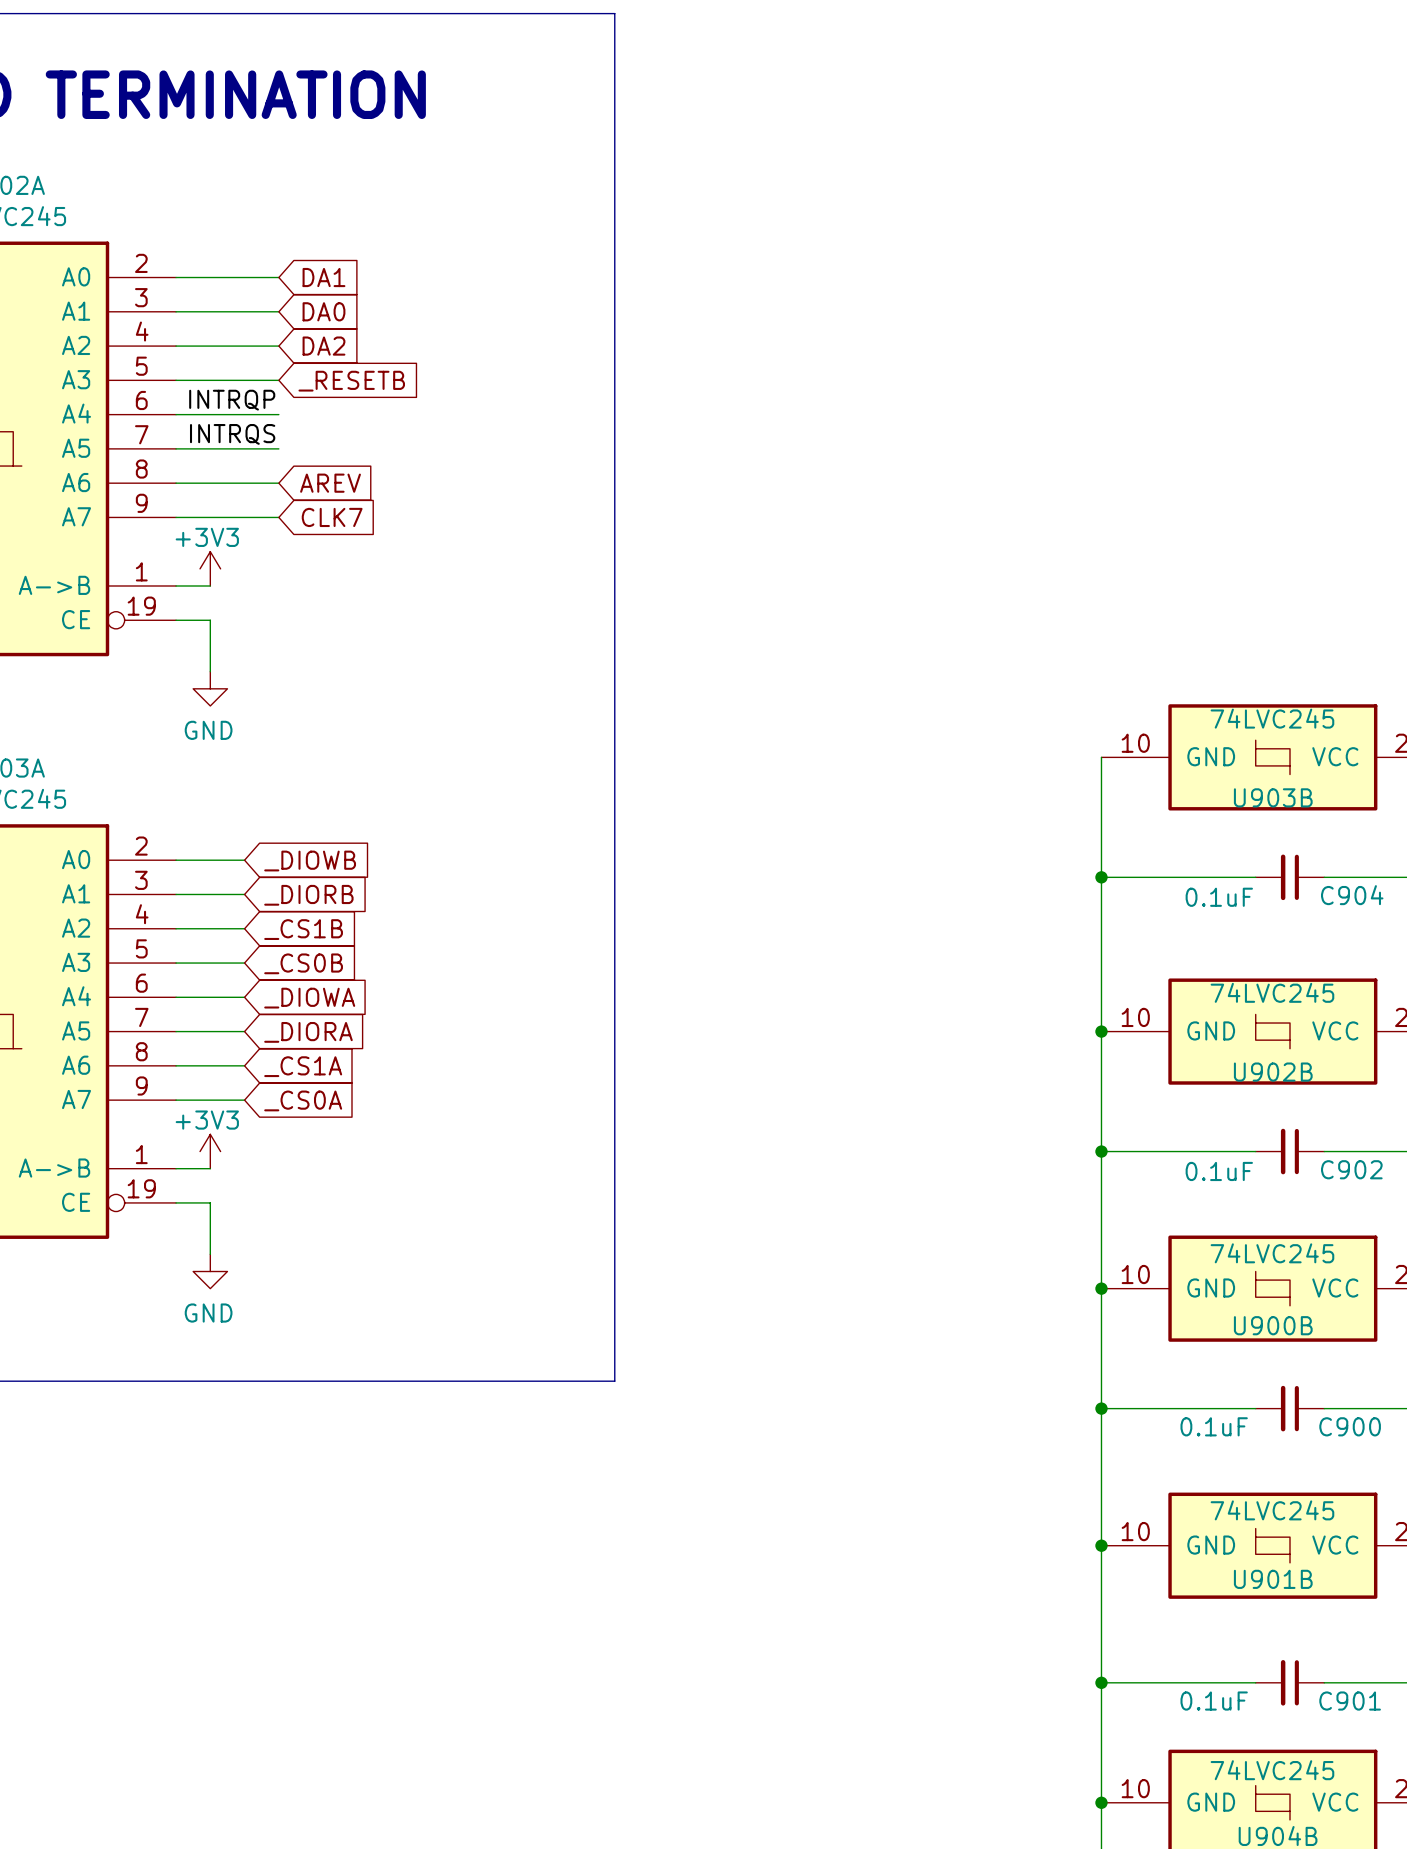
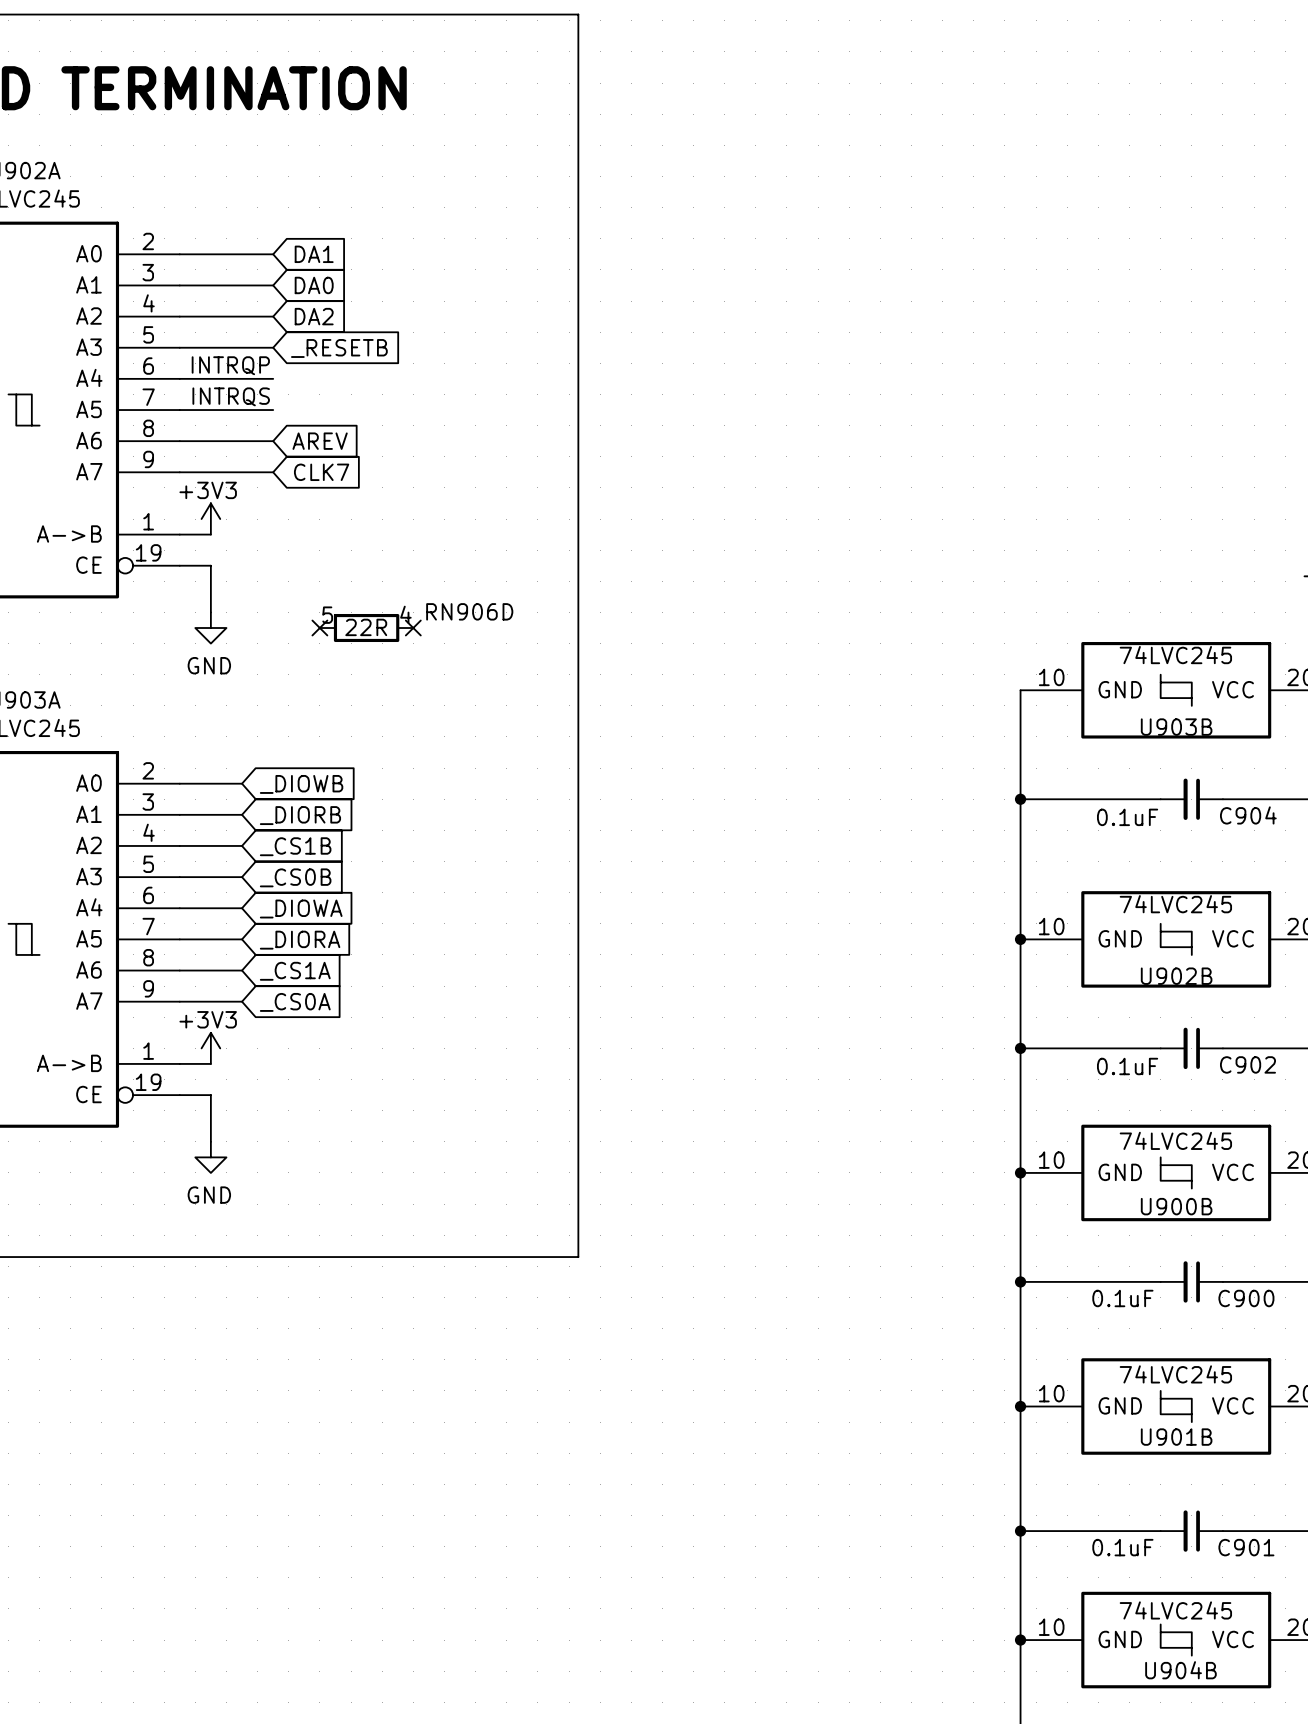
no-connect mark: none -> (319, 628)
RN906D: none -> 22R (366, 628)
no-connect mark: none -> (413, 628)

